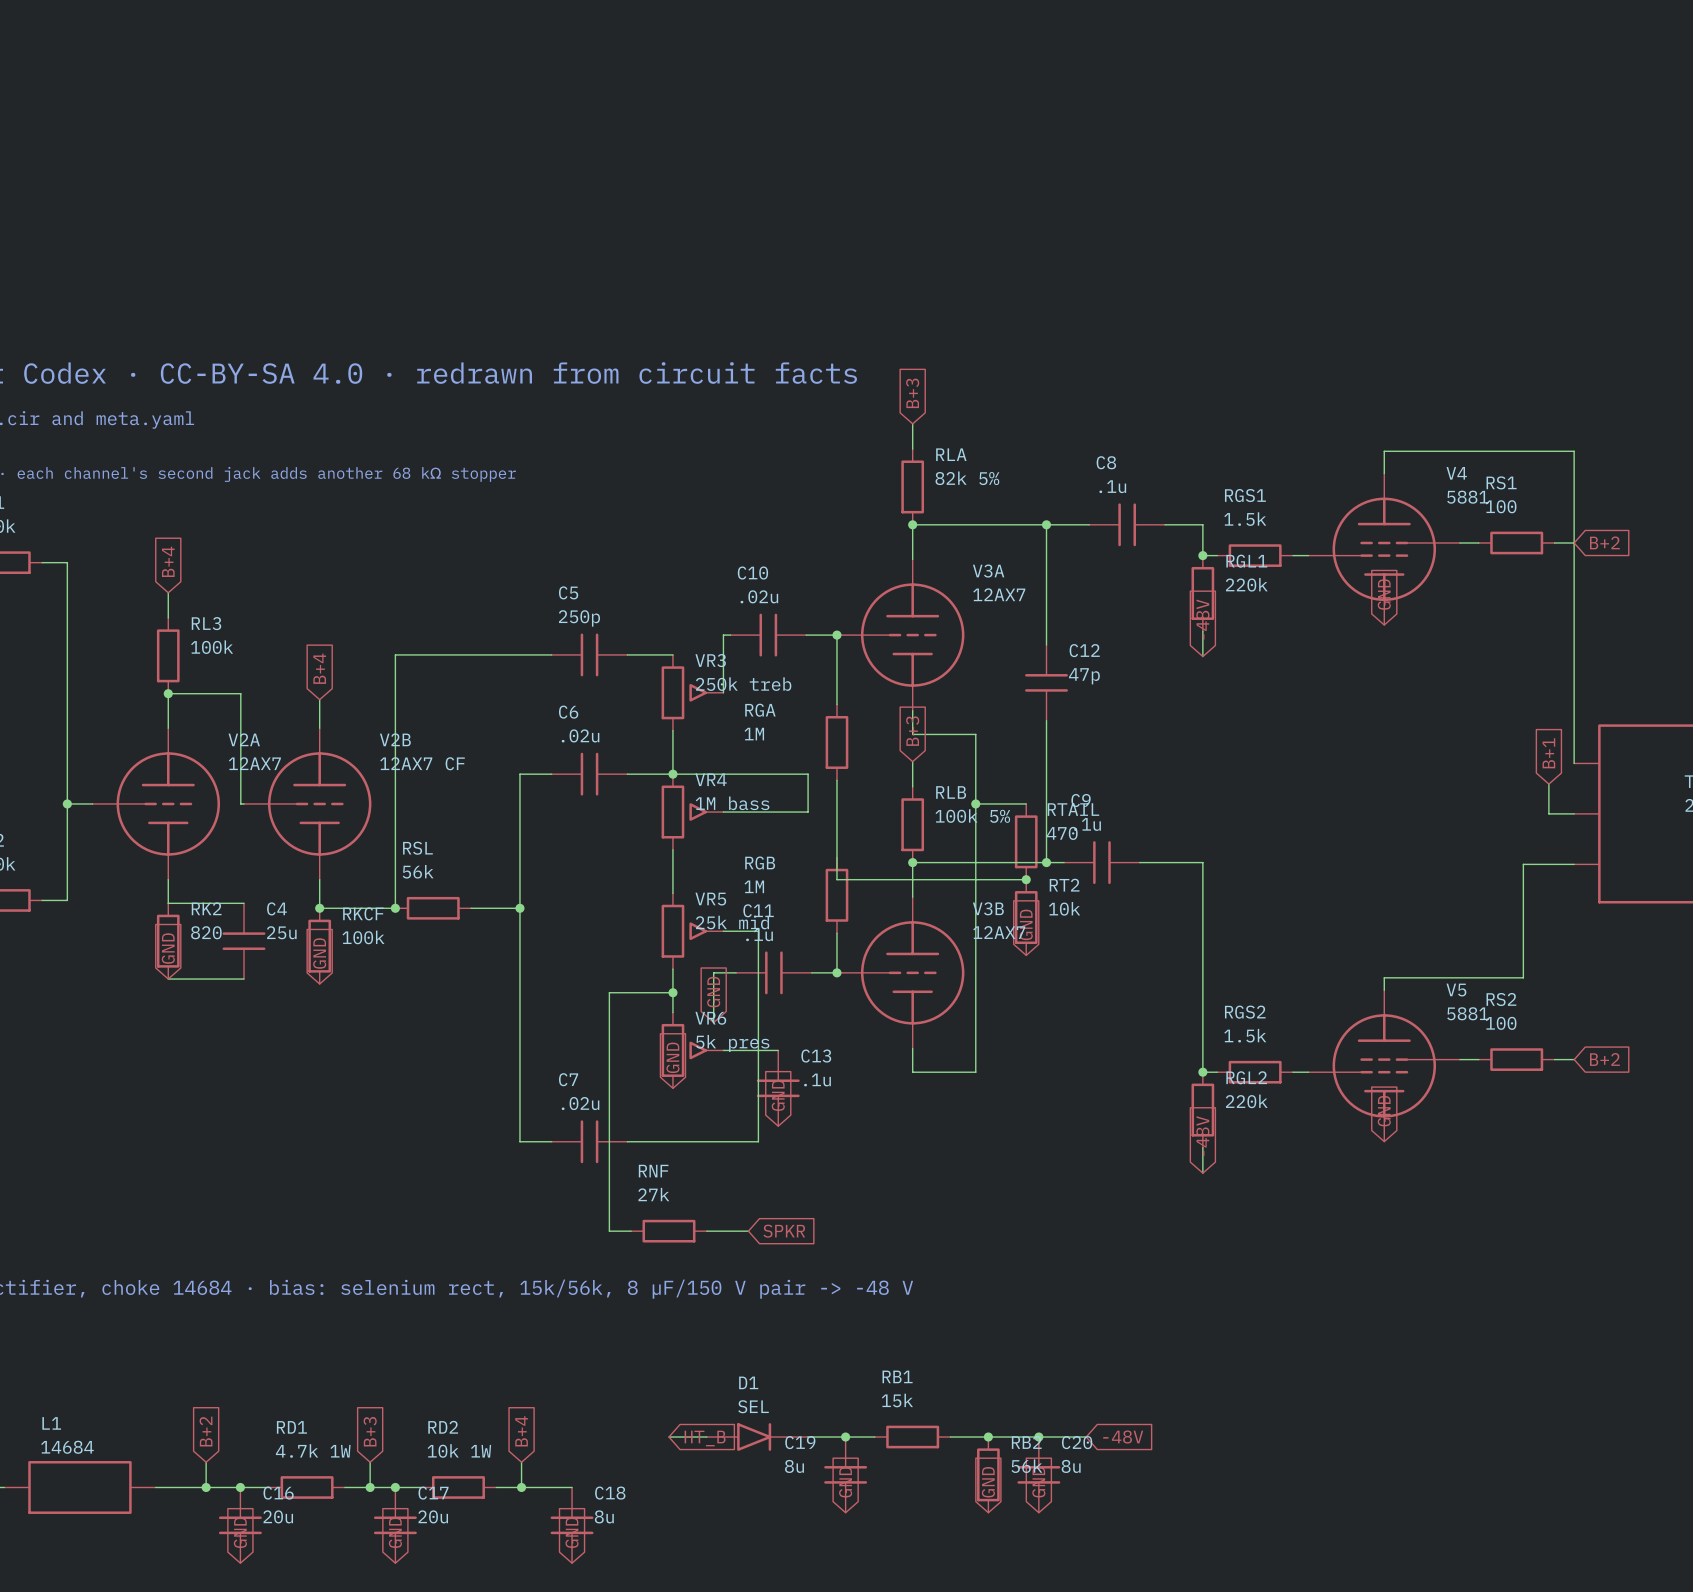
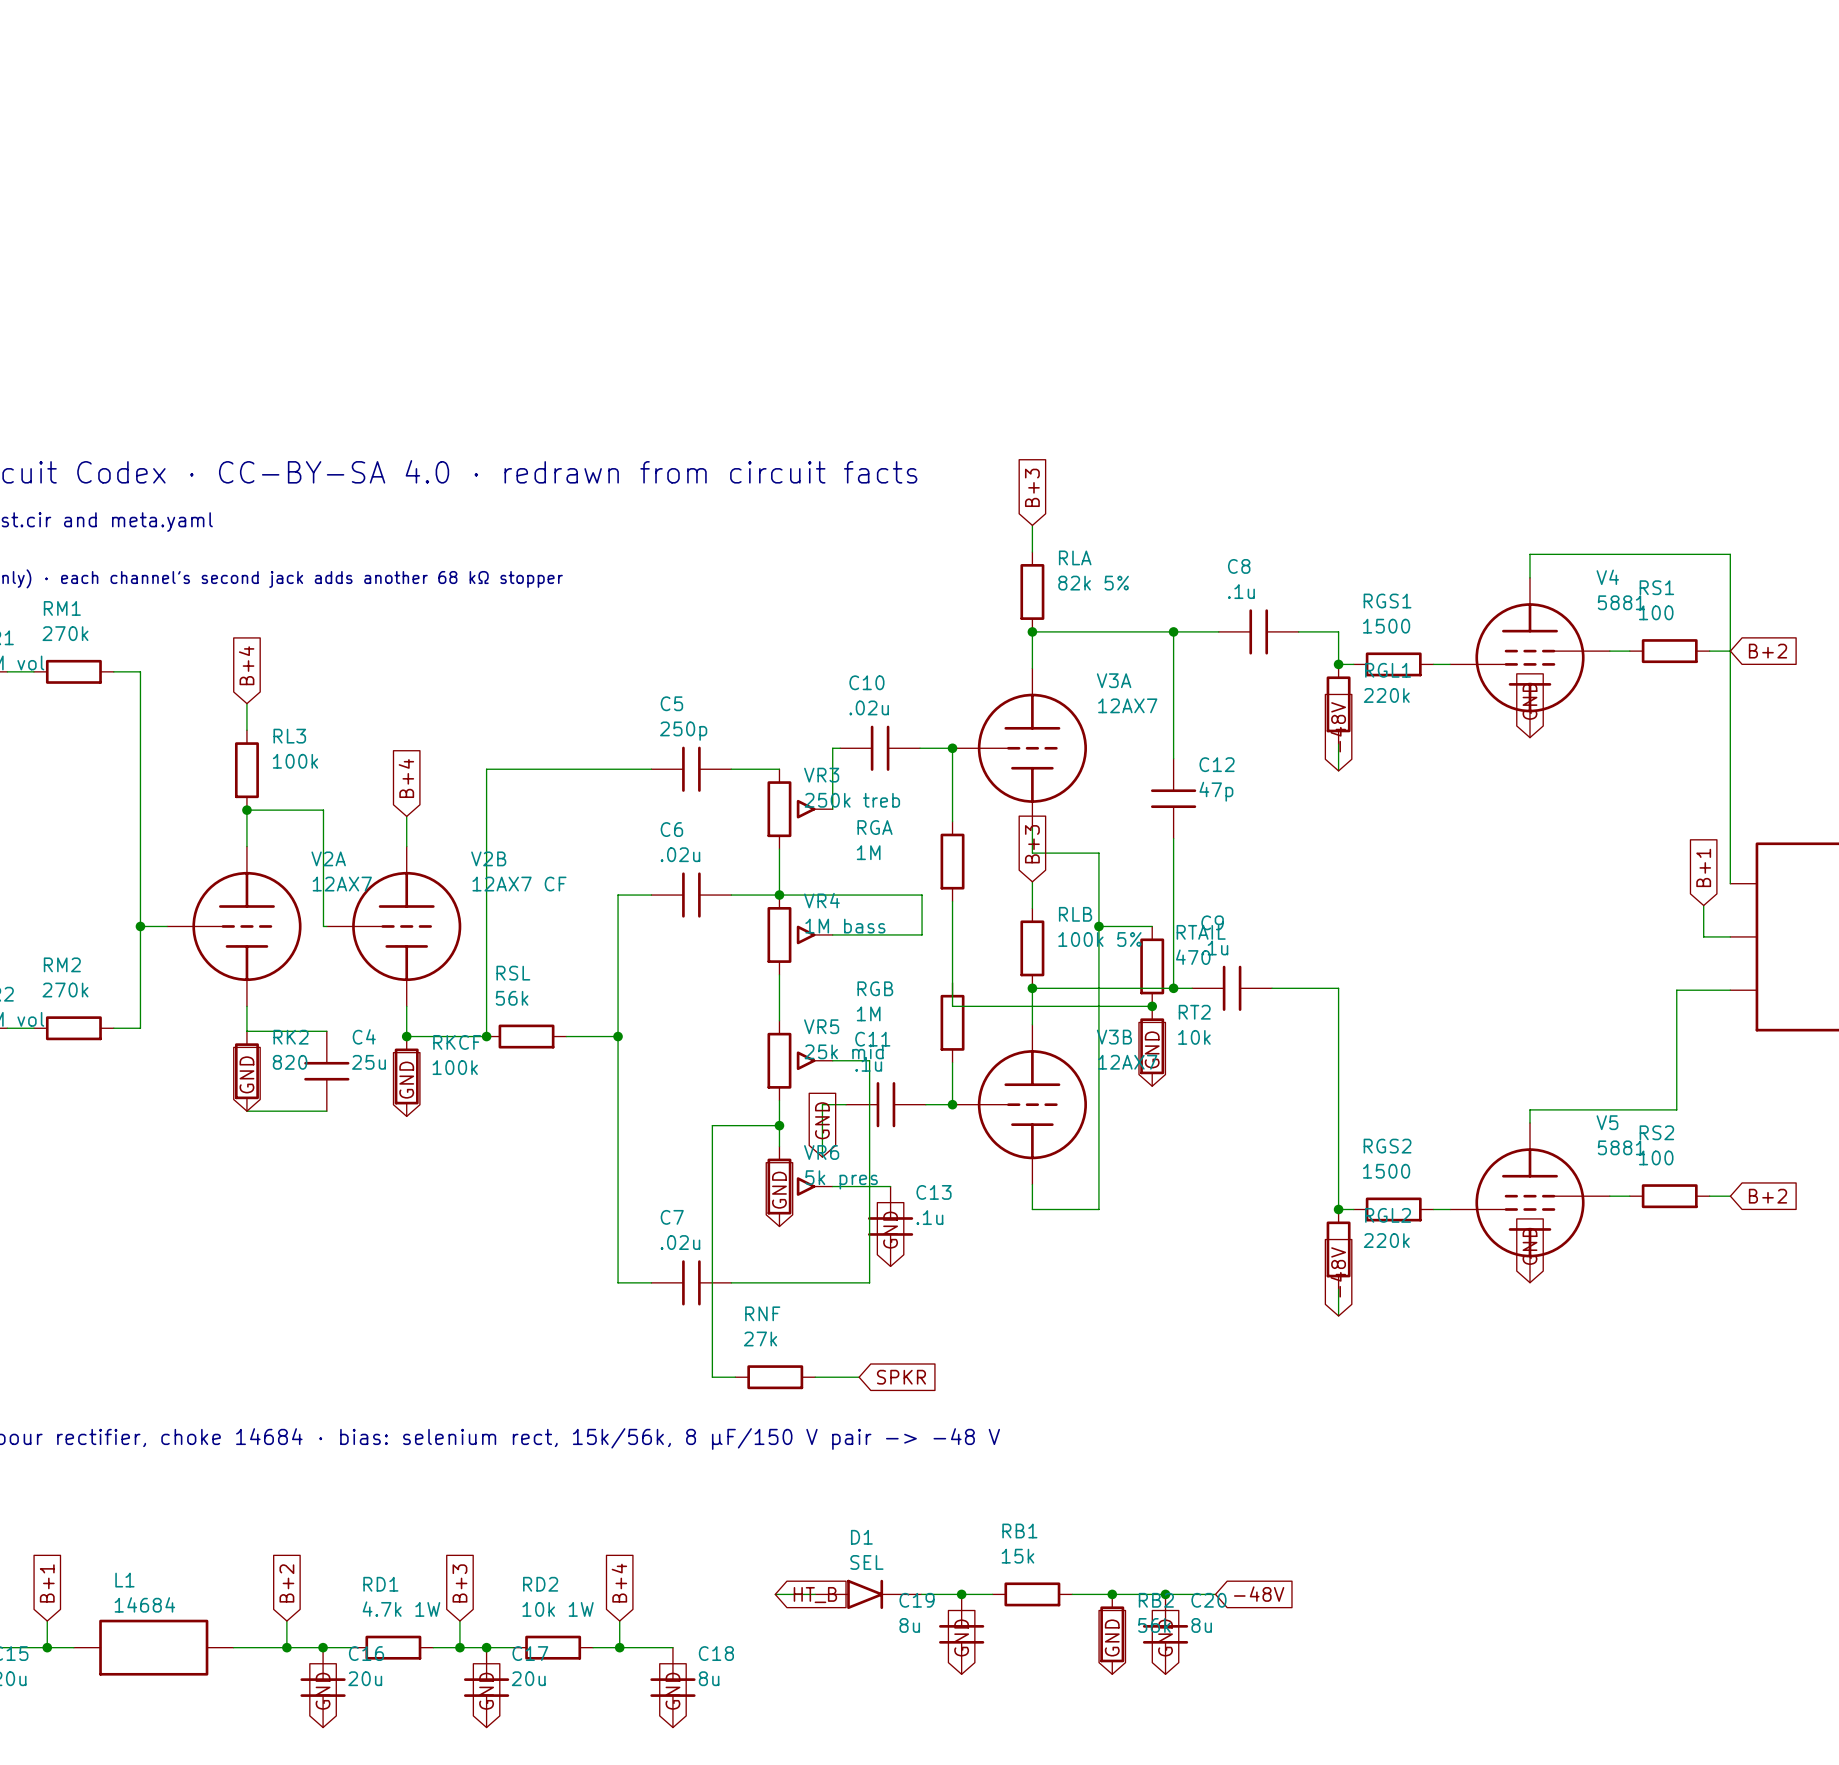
RGS1 value: 1.5k (1245, 519) -> 1500 (1386, 626)
RGS2 value: 1.5k (1245, 1035) -> 1500 (1386, 1171)

